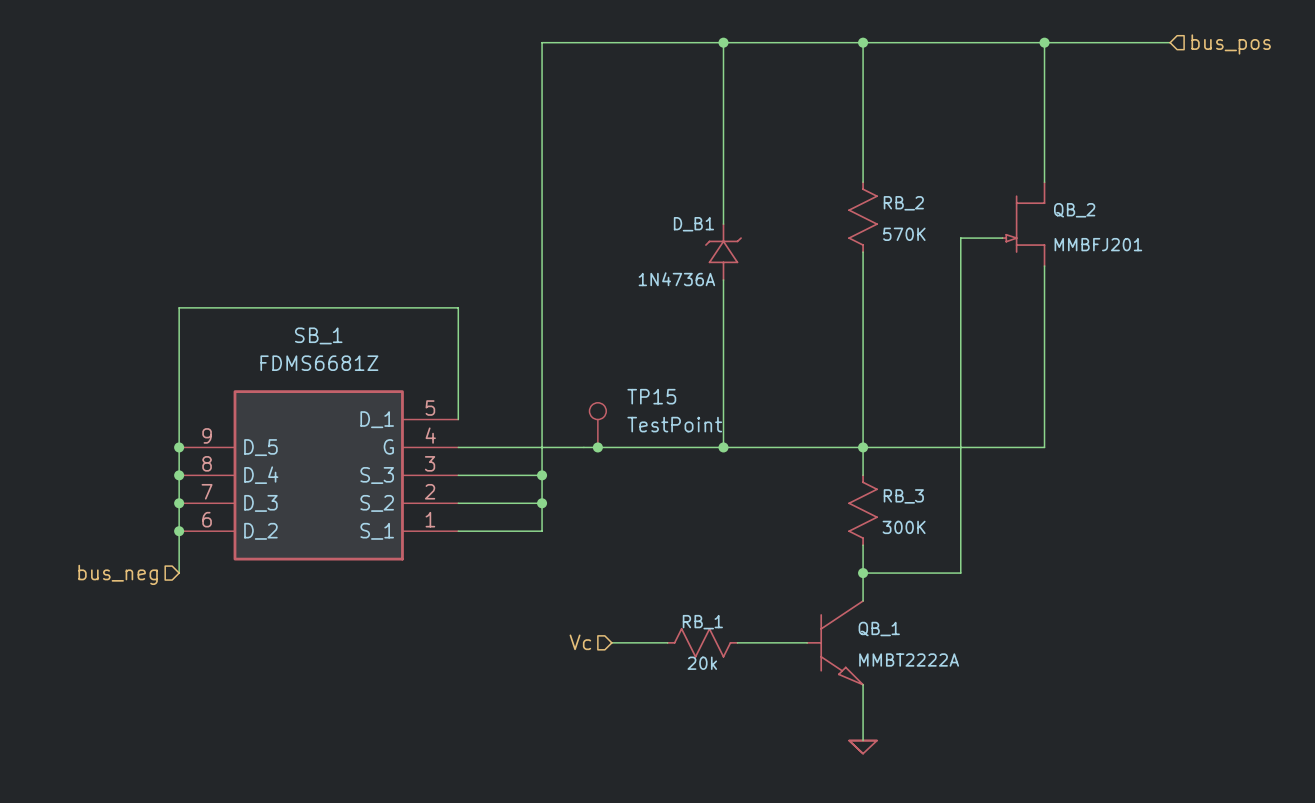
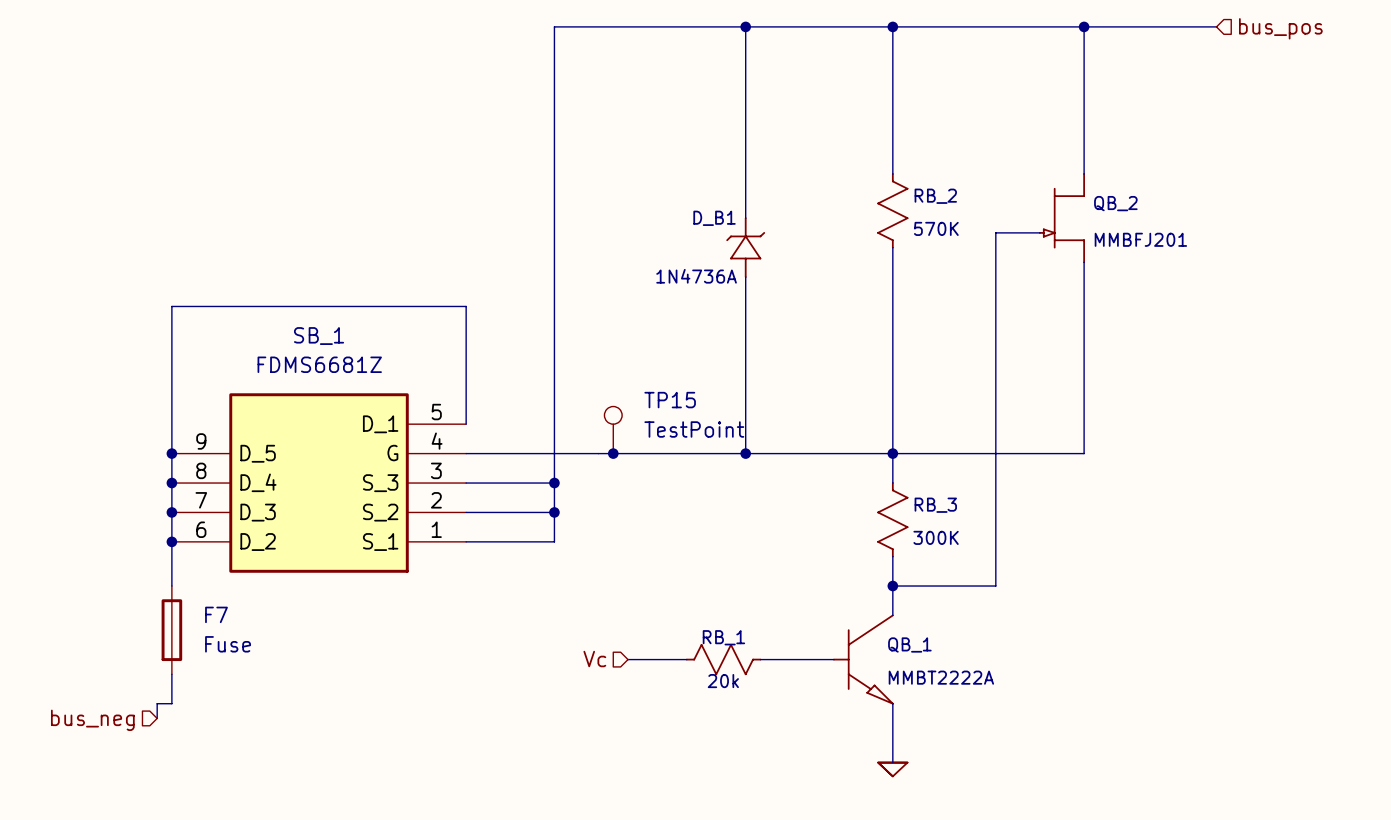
hierarchical label position: bus_neg (118, 574) -> bus_neg (92, 720)
F7: none -> Fuse (171, 630)
wire: none -> (171, 674) (171, 703) (157, 703) (157, 718)

